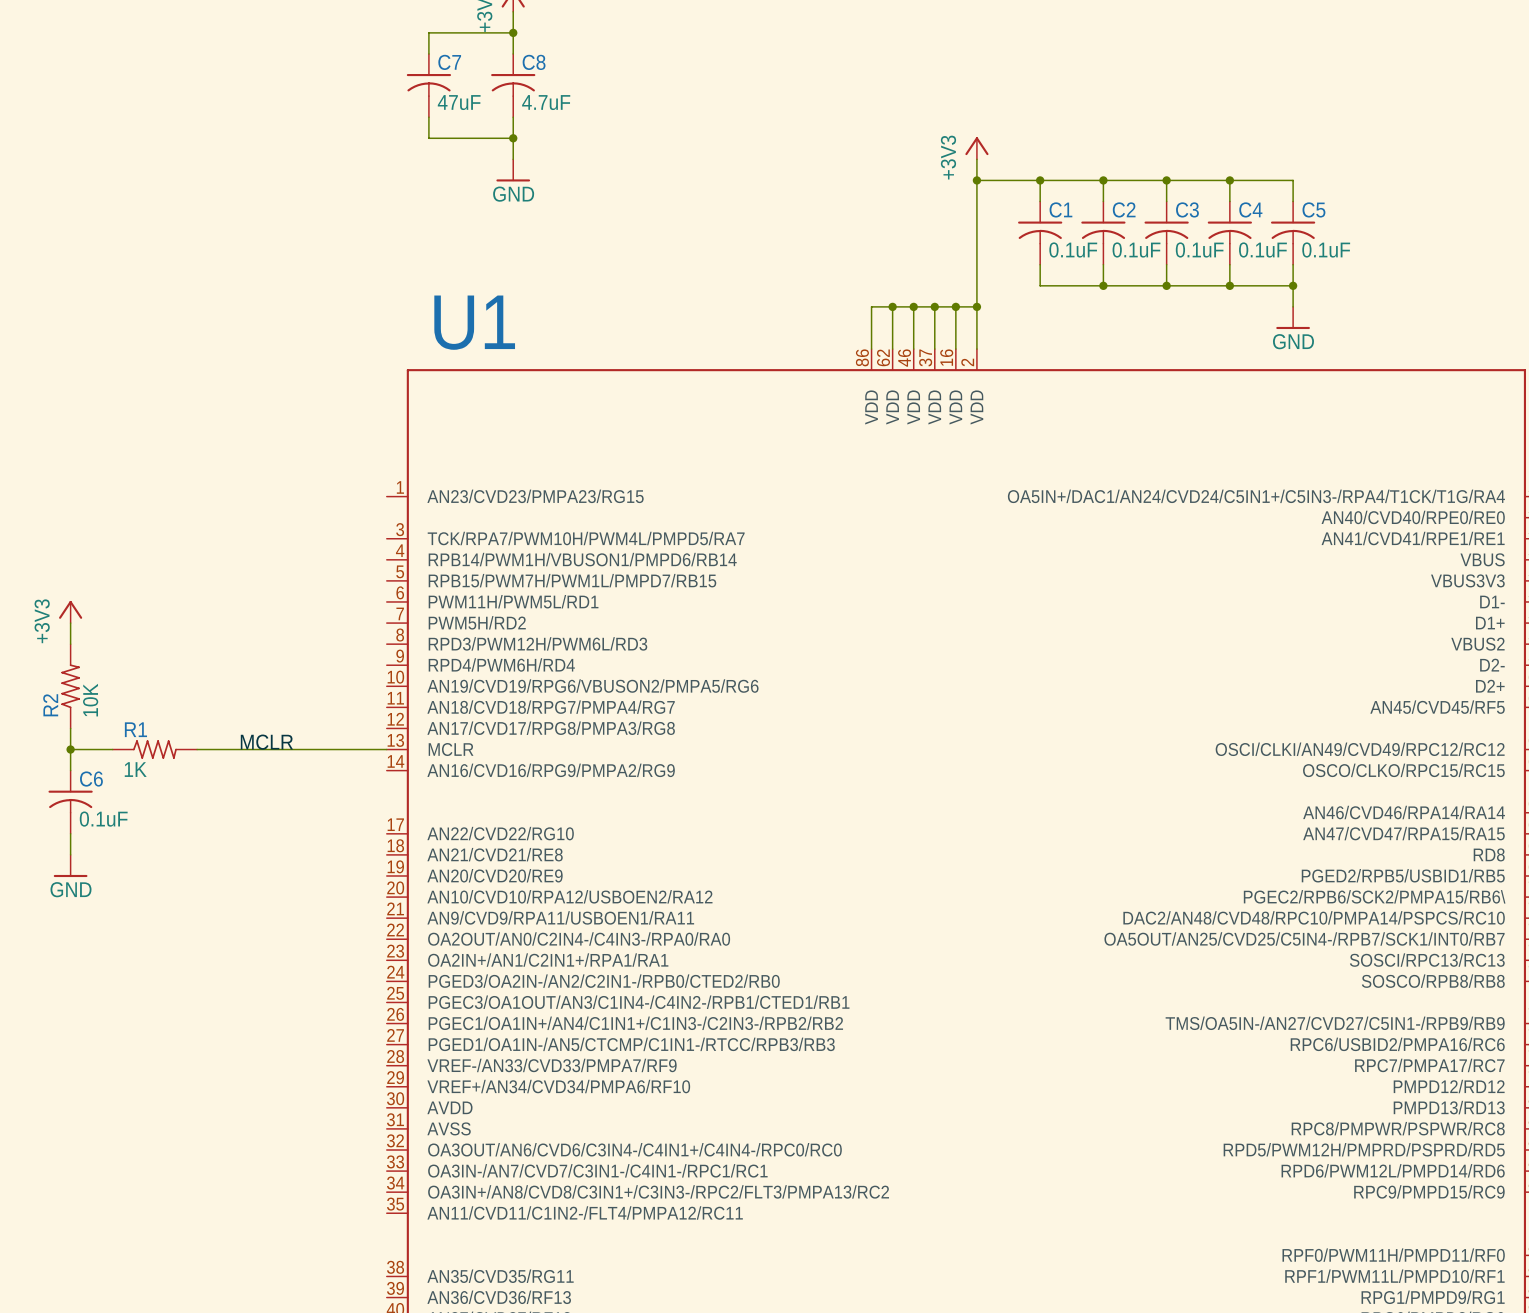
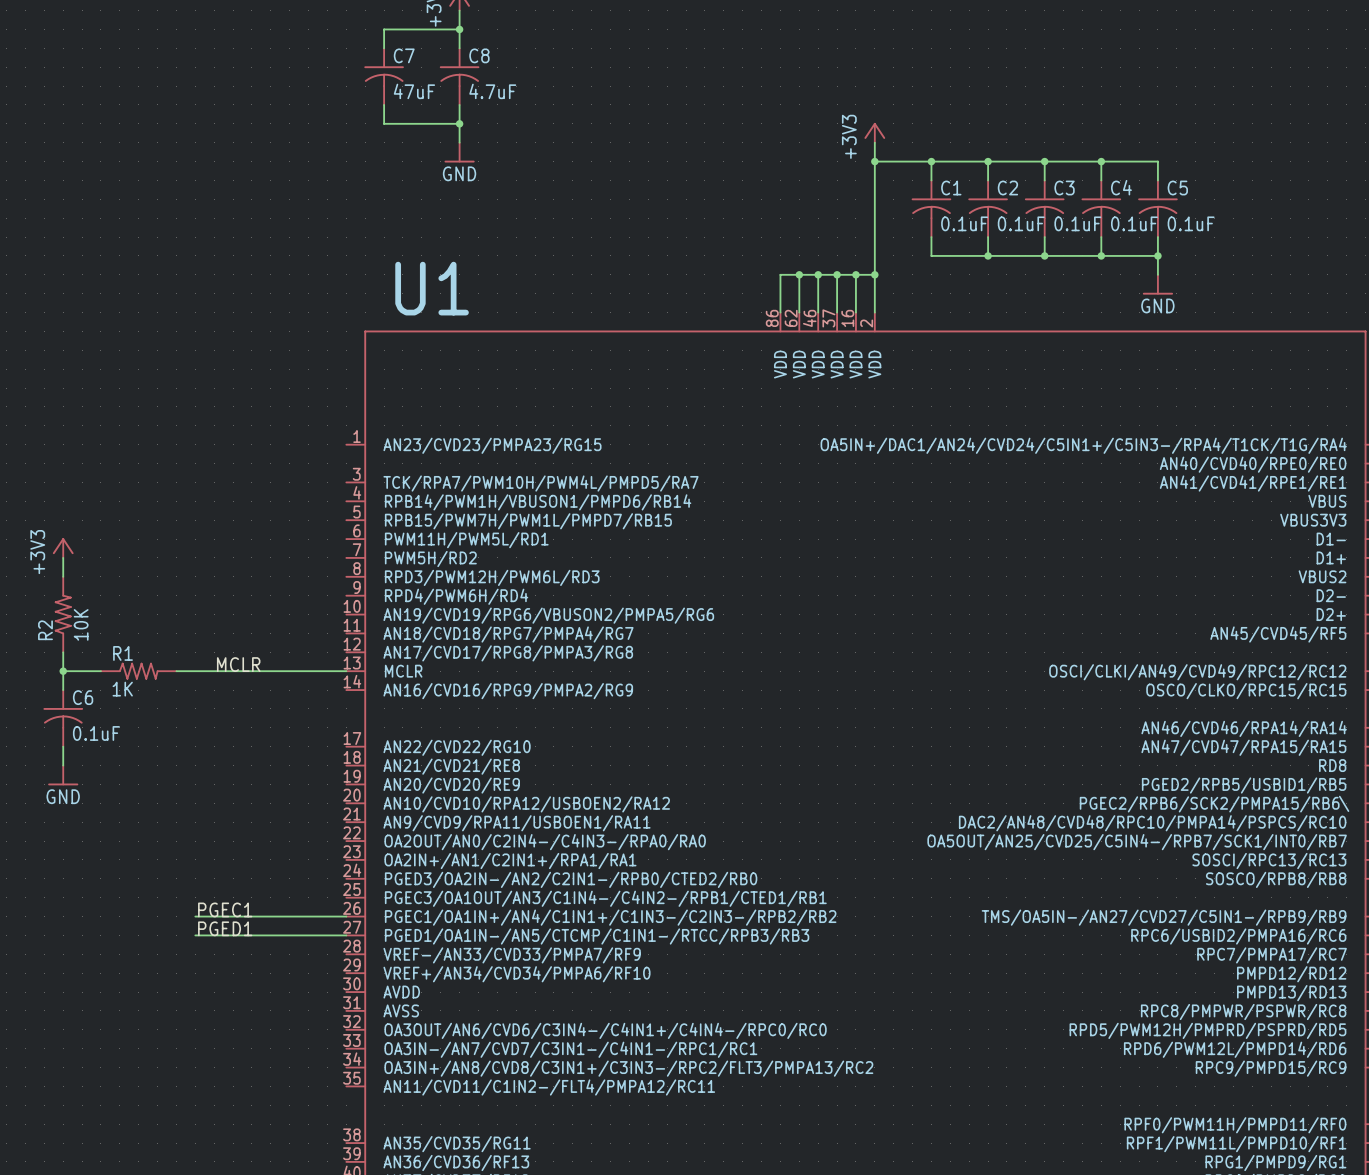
label: none -> PGEC1 (225, 909)
wire: none -> (195, 916) (346, 916)
label: none -> PGED1 (225, 928)
wire: none -> (195, 935) (346, 935)

